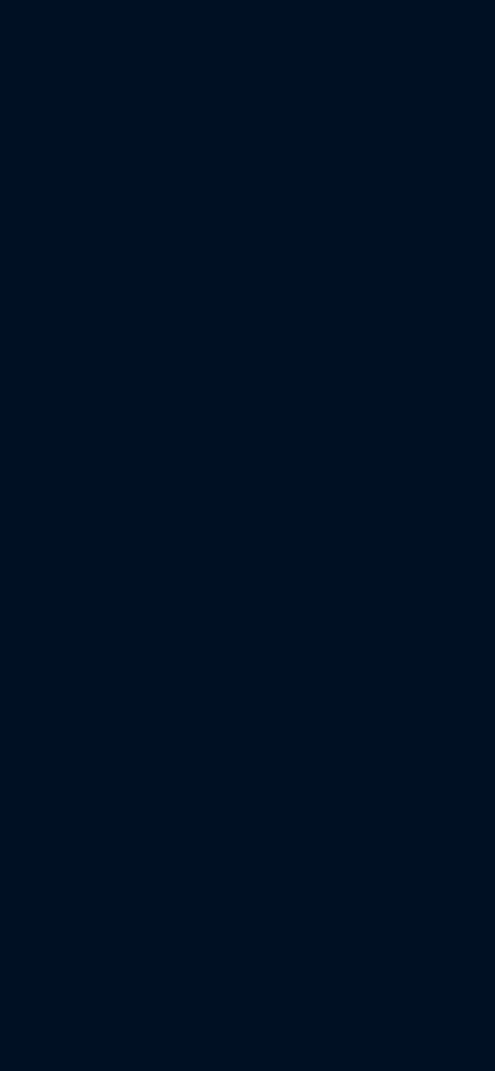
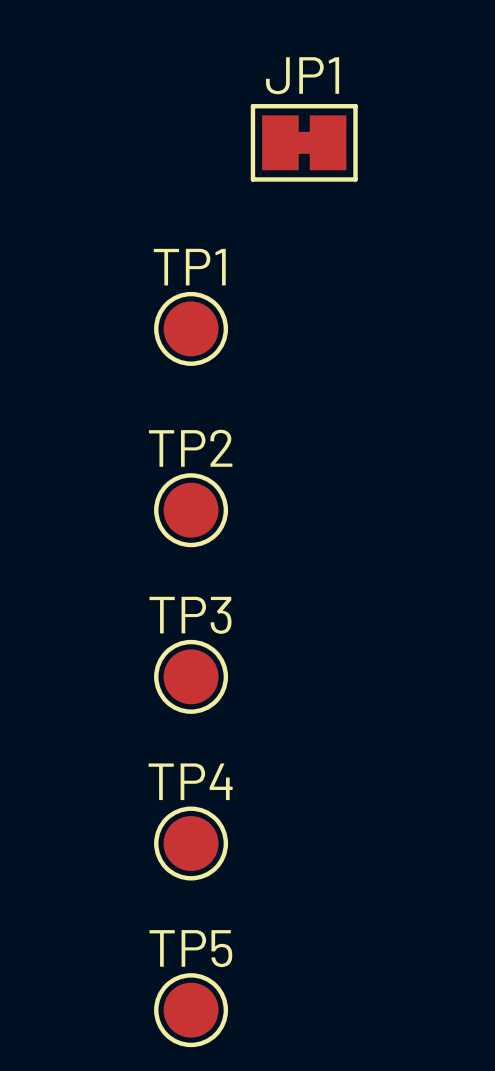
JP1: none -> (304, 142)
TP1: none -> (191, 328)
TP2: none -> (191, 510)
TP3: none -> (191, 676)
TP4: none -> (191, 843)
TP5: none -> (191, 1010)

